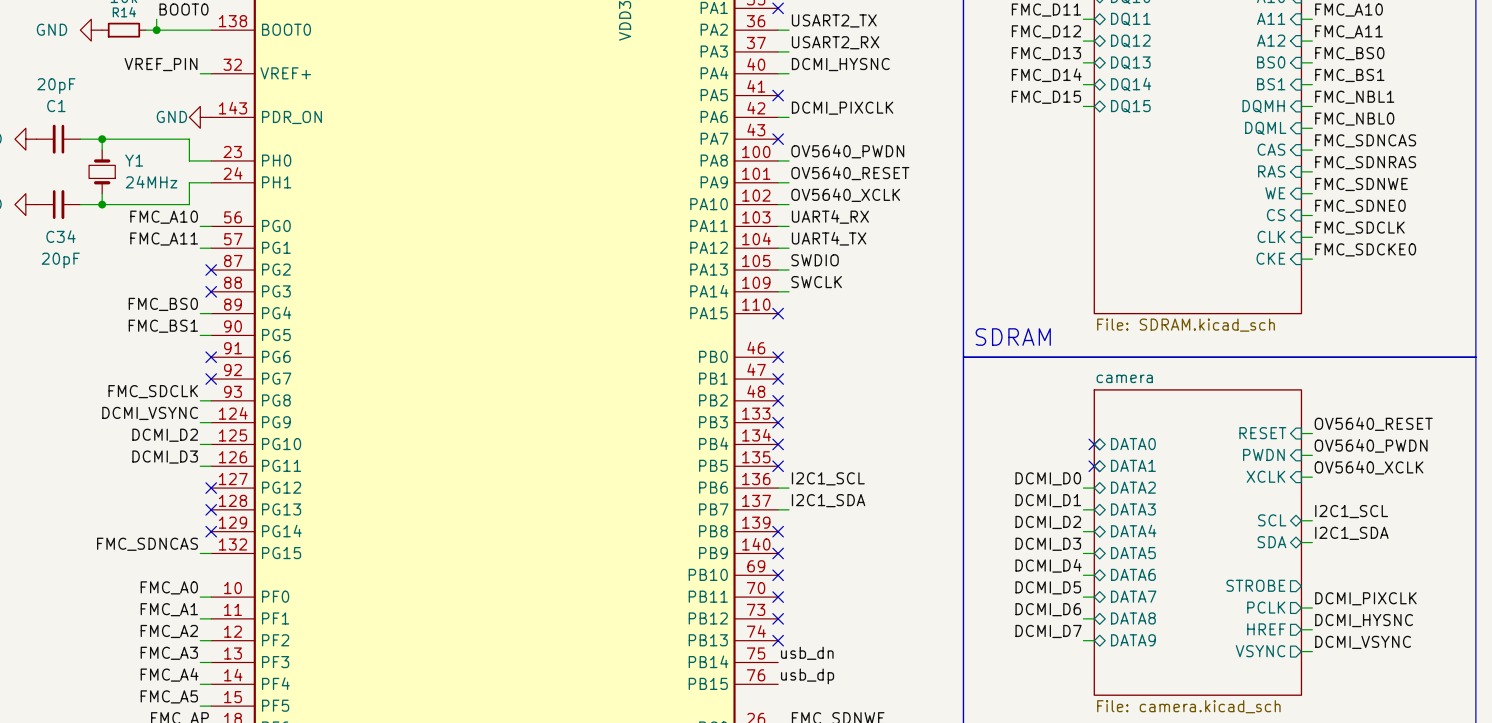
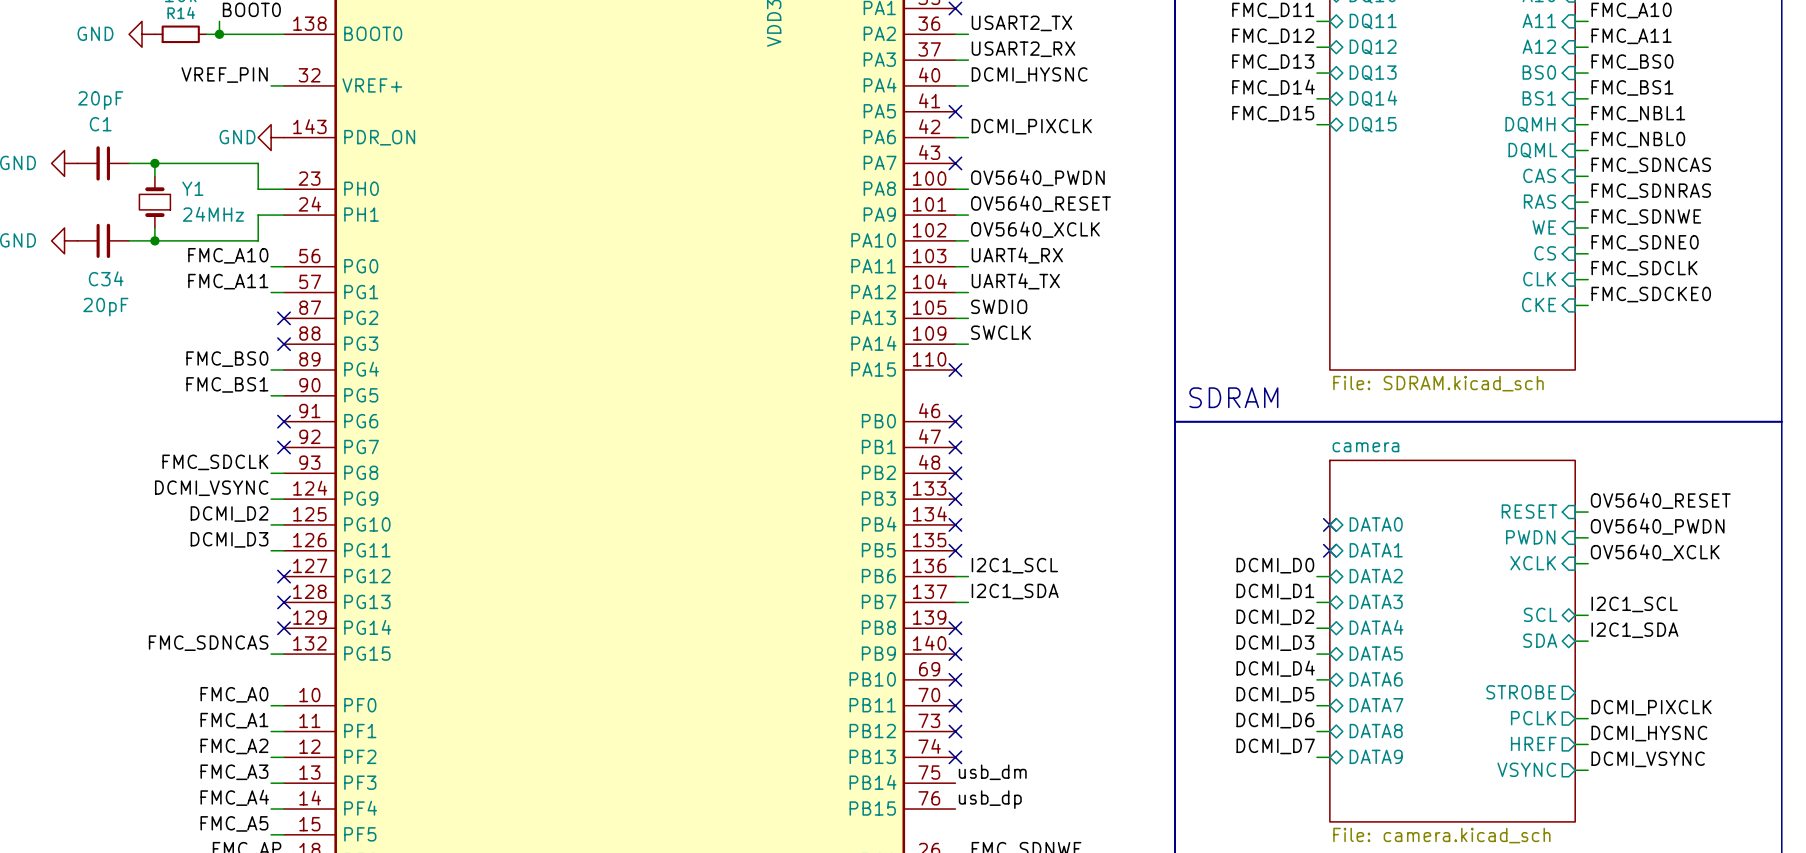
label: usb_dn (807, 653) -> usb_dm (992, 772)

